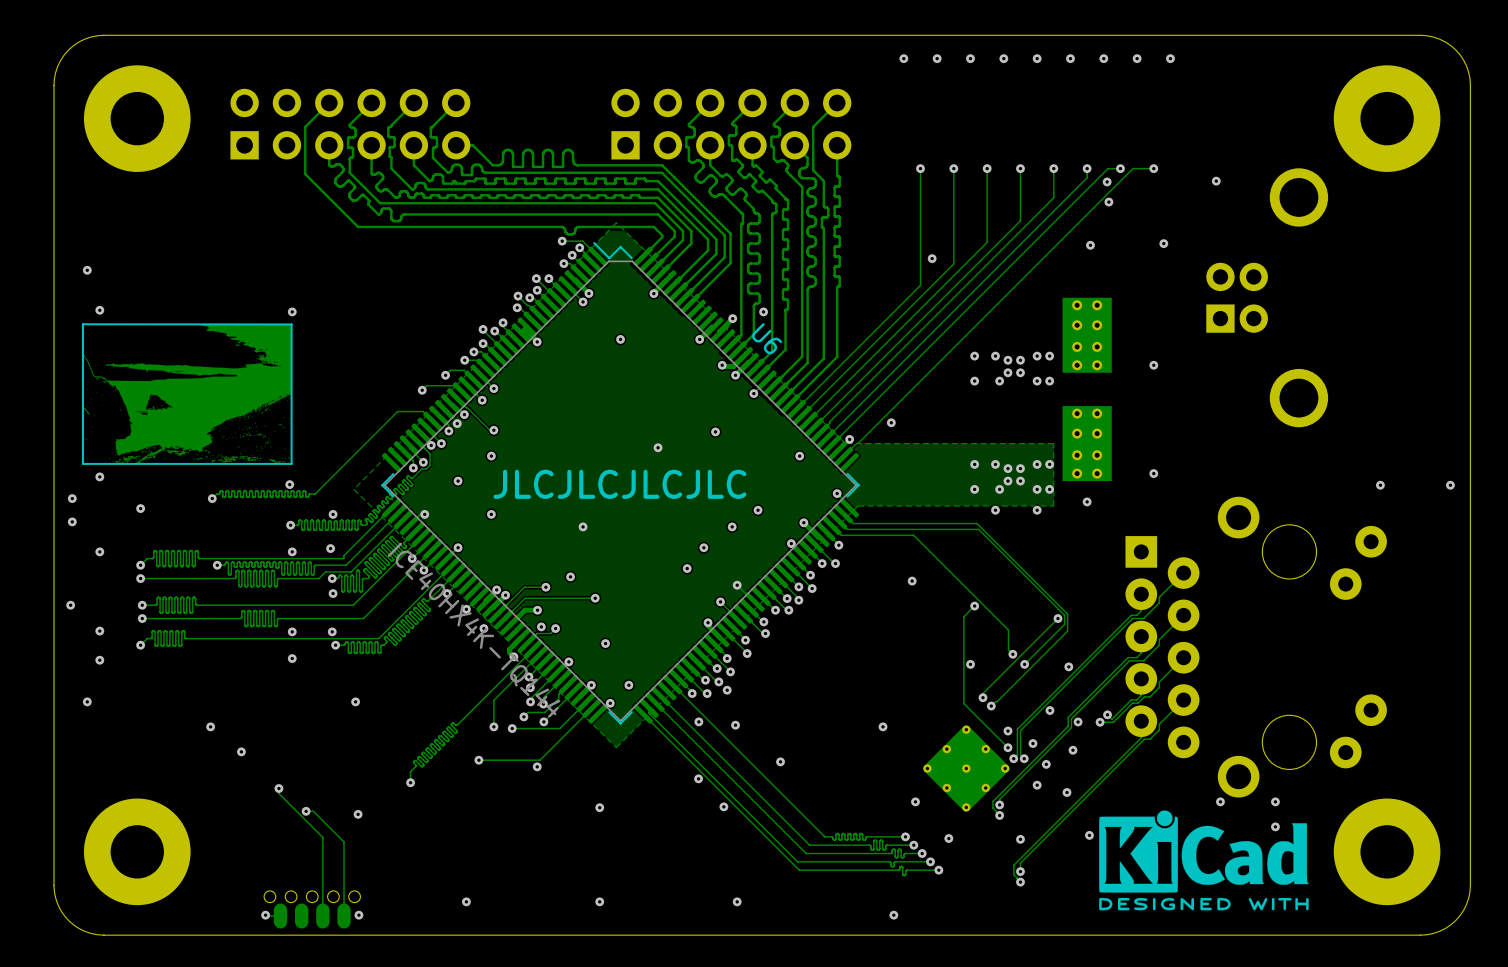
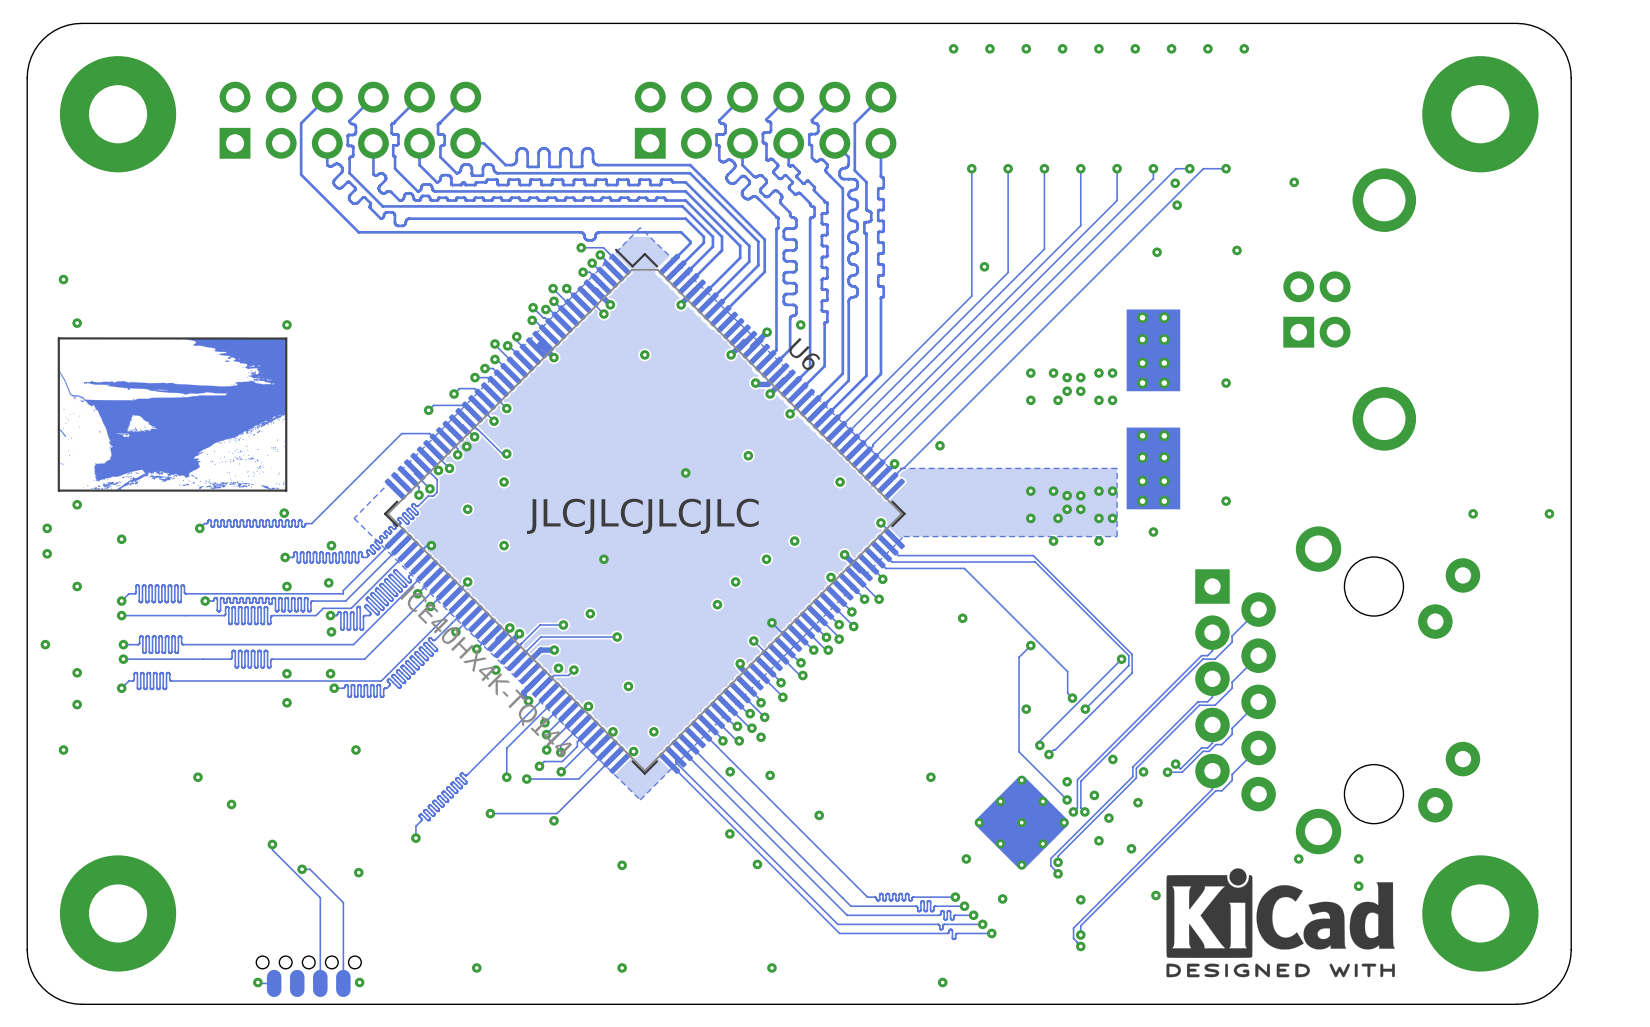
via: (1068, 666) -> none

